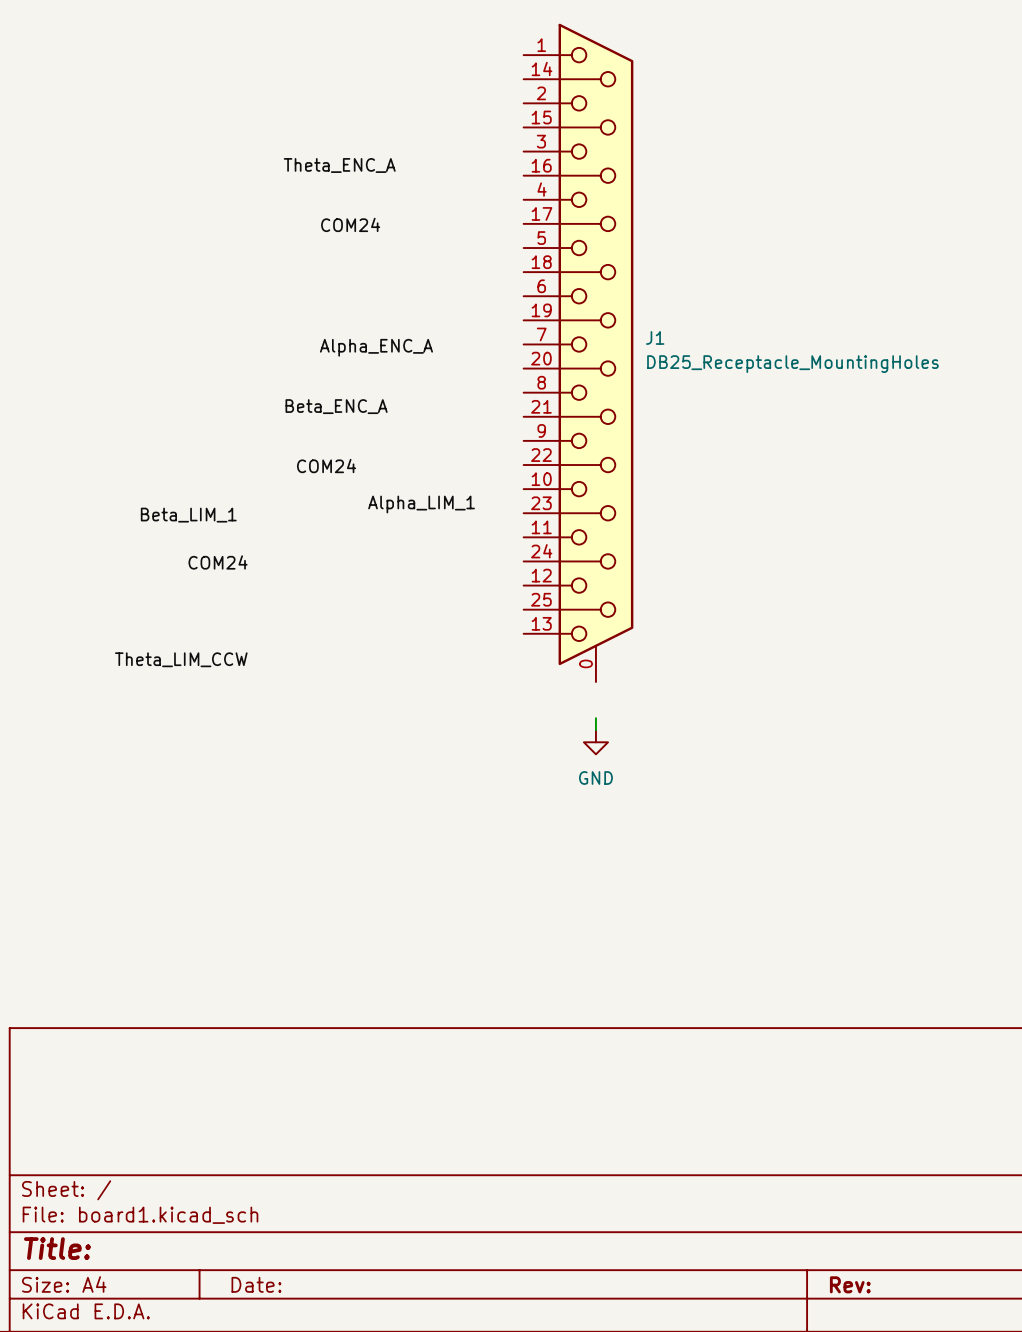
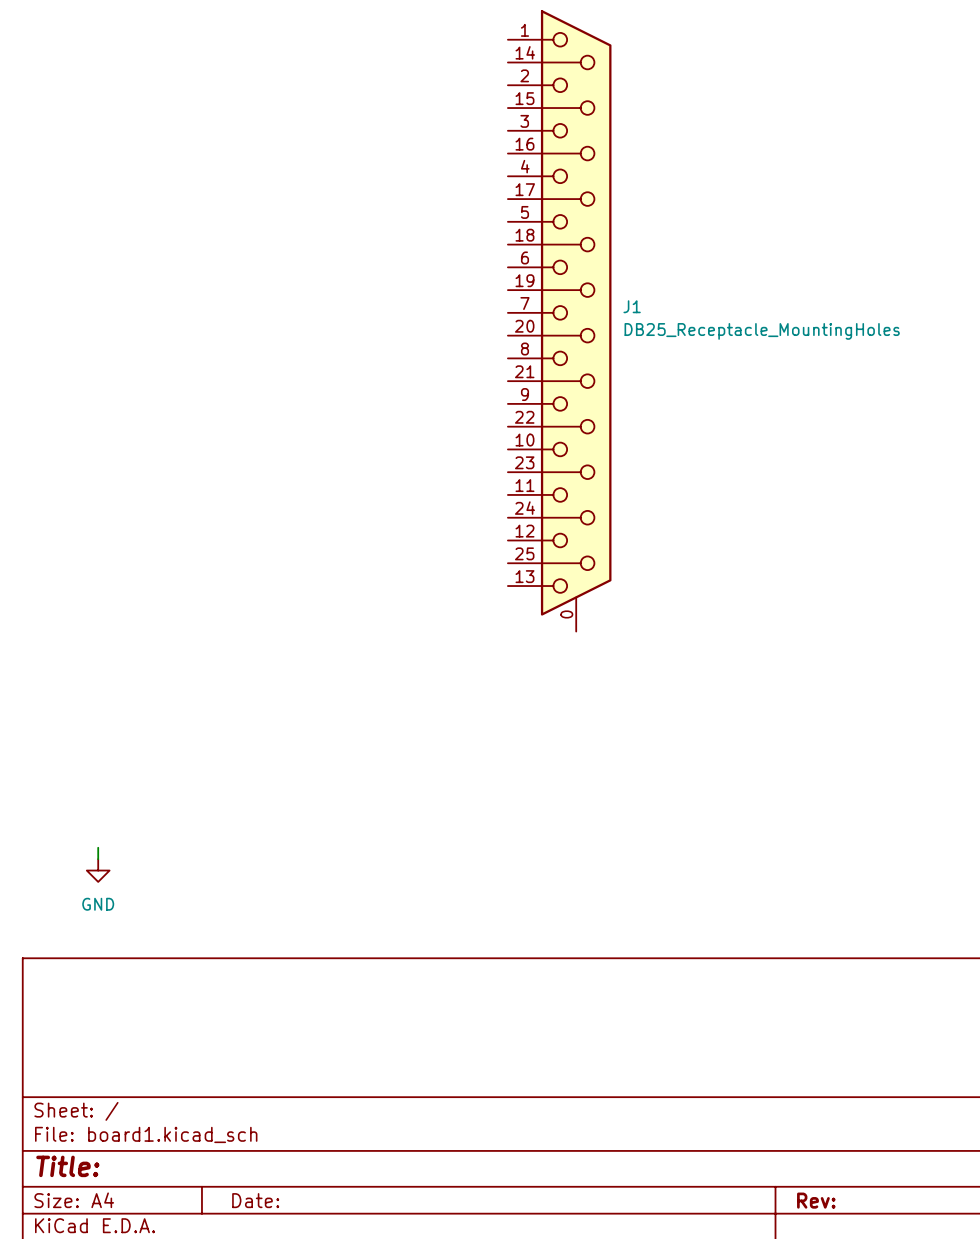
label: Theta_ENC_A (339, 165) -> none
label: COM24 (350, 224) -> none
label: Alpha_ENC_A (376, 347) -> none
label: Beta_ENC_A (336, 406) -> none
label: COM24 (326, 466) -> none
label: Alpha_LIM_1 (421, 504) -> none
label: Beta_LIM_1 (188, 515) -> none
label: COM24 (218, 562) -> none
label: Theta_LIM_CCW (181, 659) -> none
wire: (595, 718) (595, 730) -> none
power symbol: GND (595, 742) -> none
wire: none -> (98, 847) (98, 859)
power symbol: none -> GND (98, 870)

